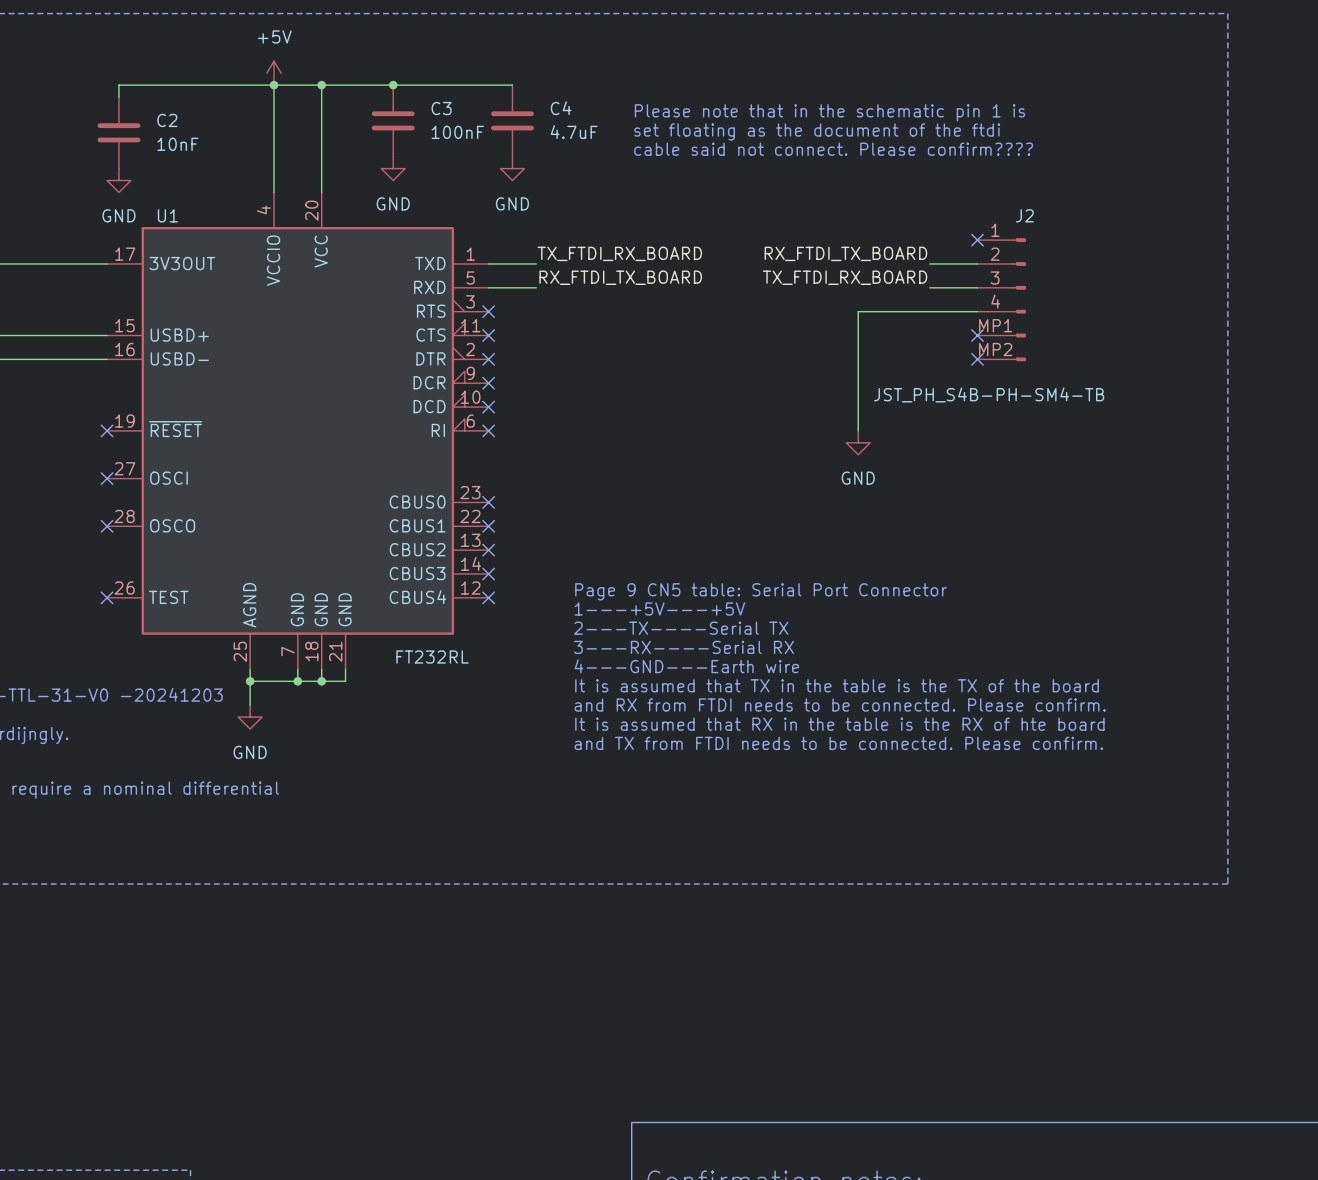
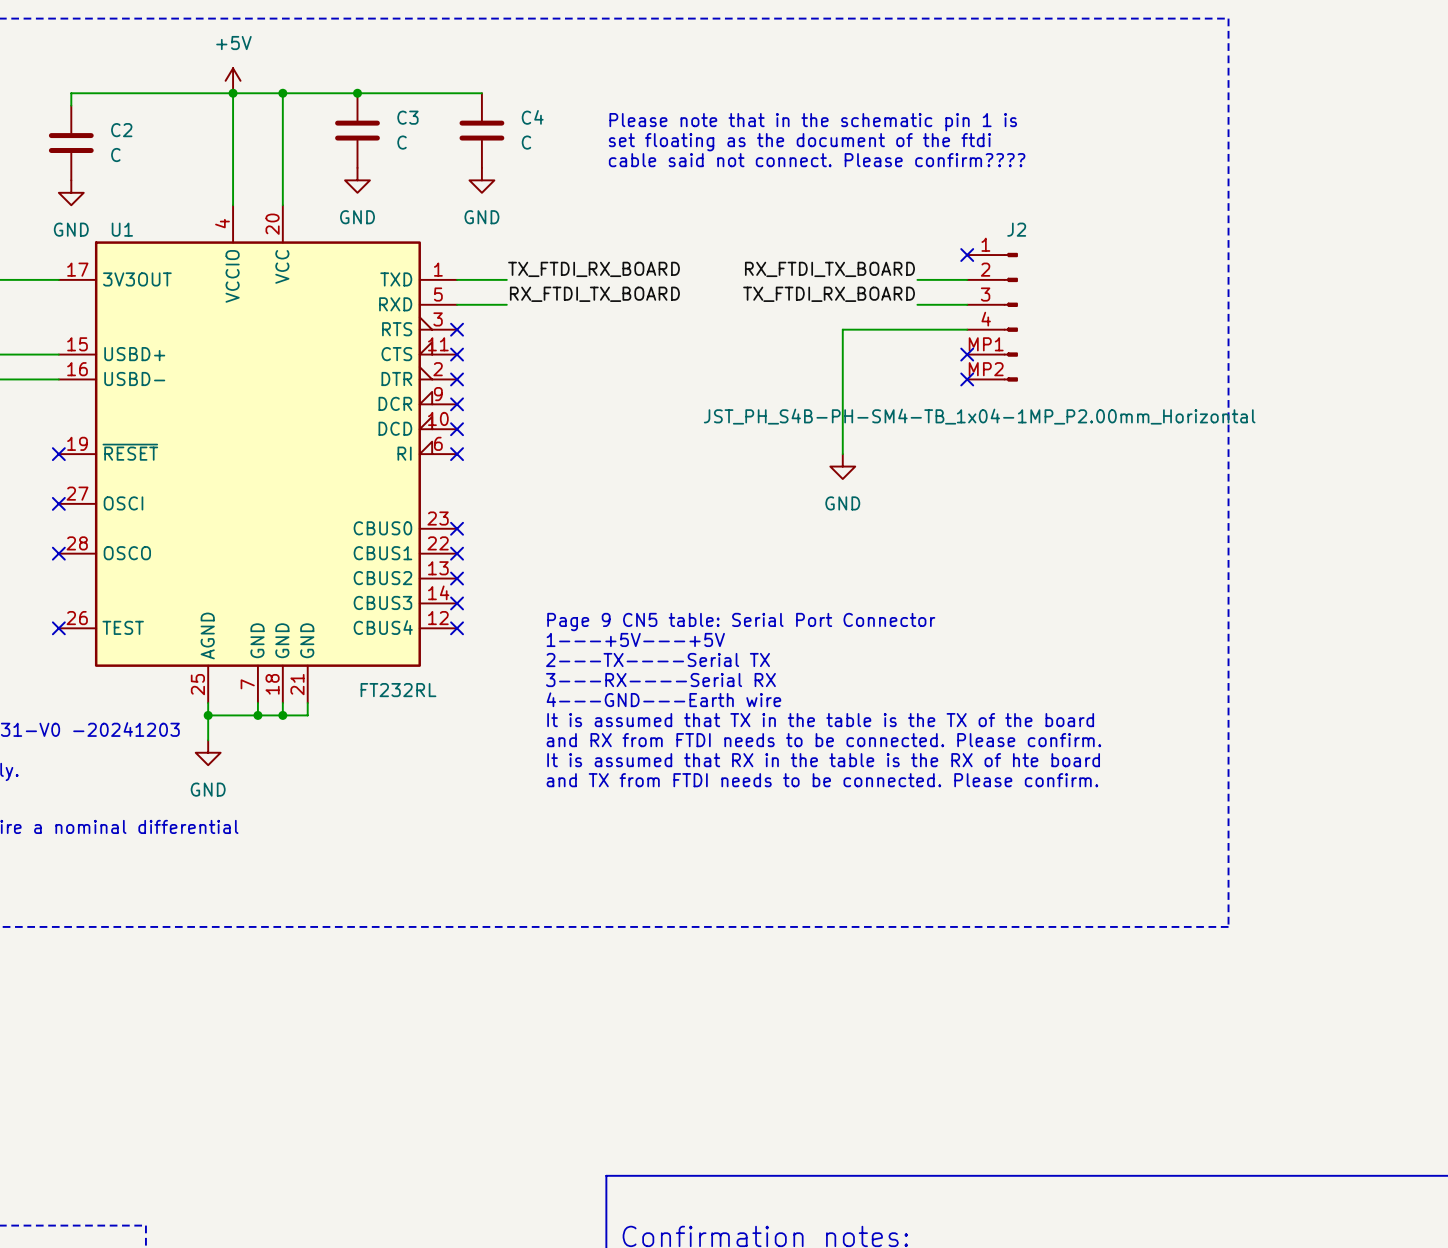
C3 value: 100nF (457, 132) -> C (402, 142)
C4 value: 4.7uF (574, 132) -> C (526, 142)
C2 value: 10nF (177, 144) -> C (115, 155)
J2 value: JST_PH_S4B-PH-SM4-TB (989, 394) -> JST_PH_S4B-PH-SM4-TB_1x04-1MP_P2.00mm_Horizontal (979, 416)

